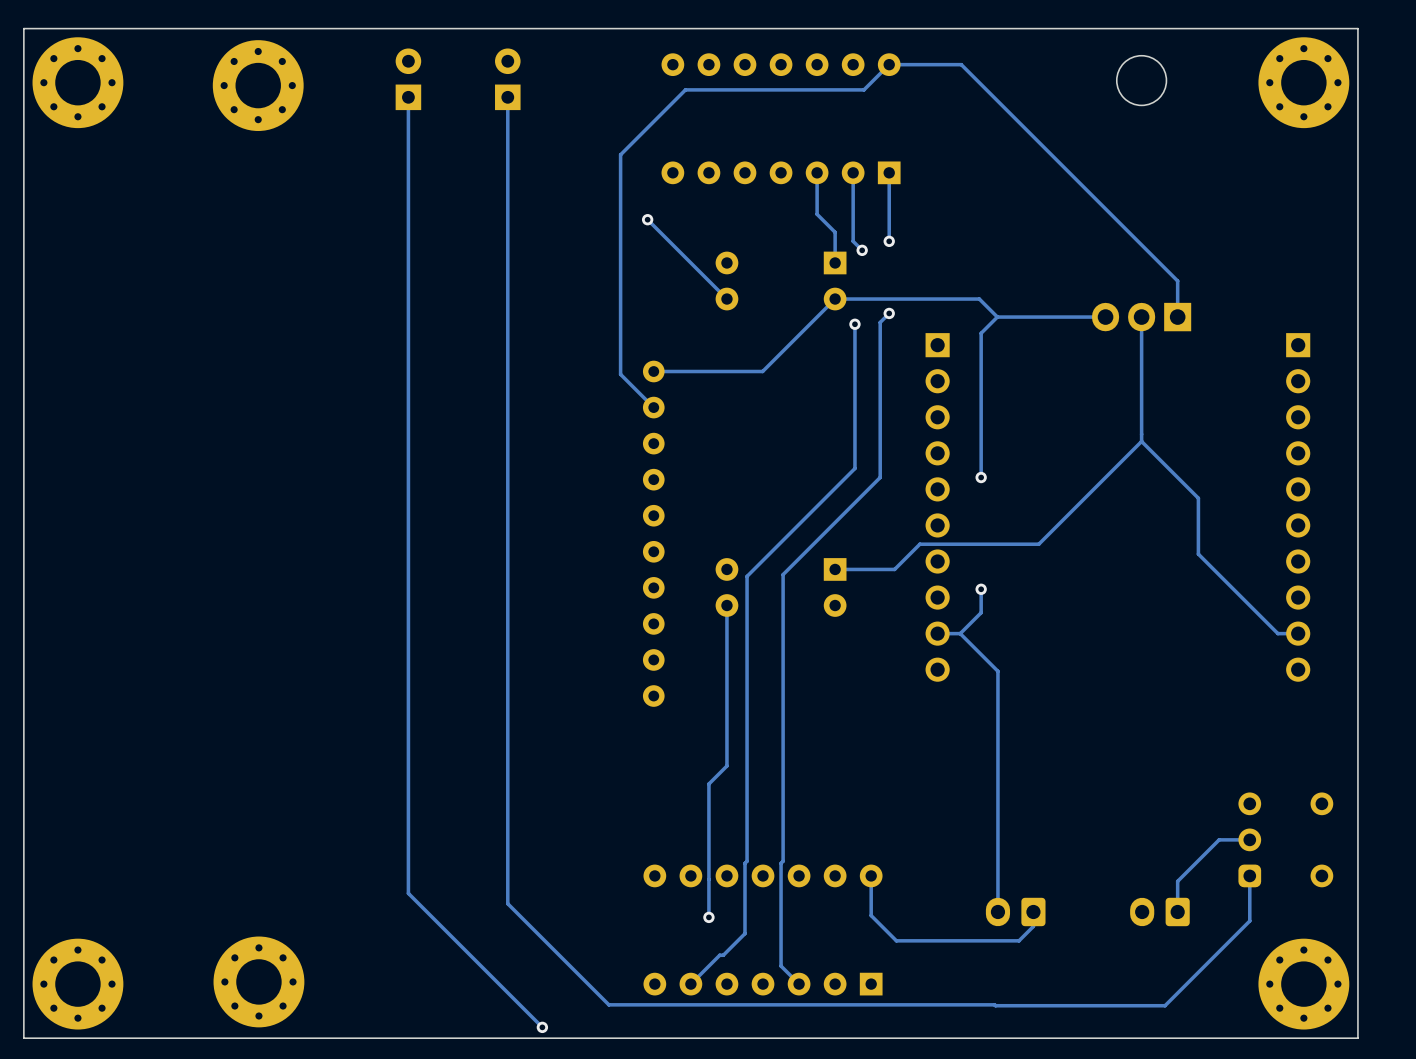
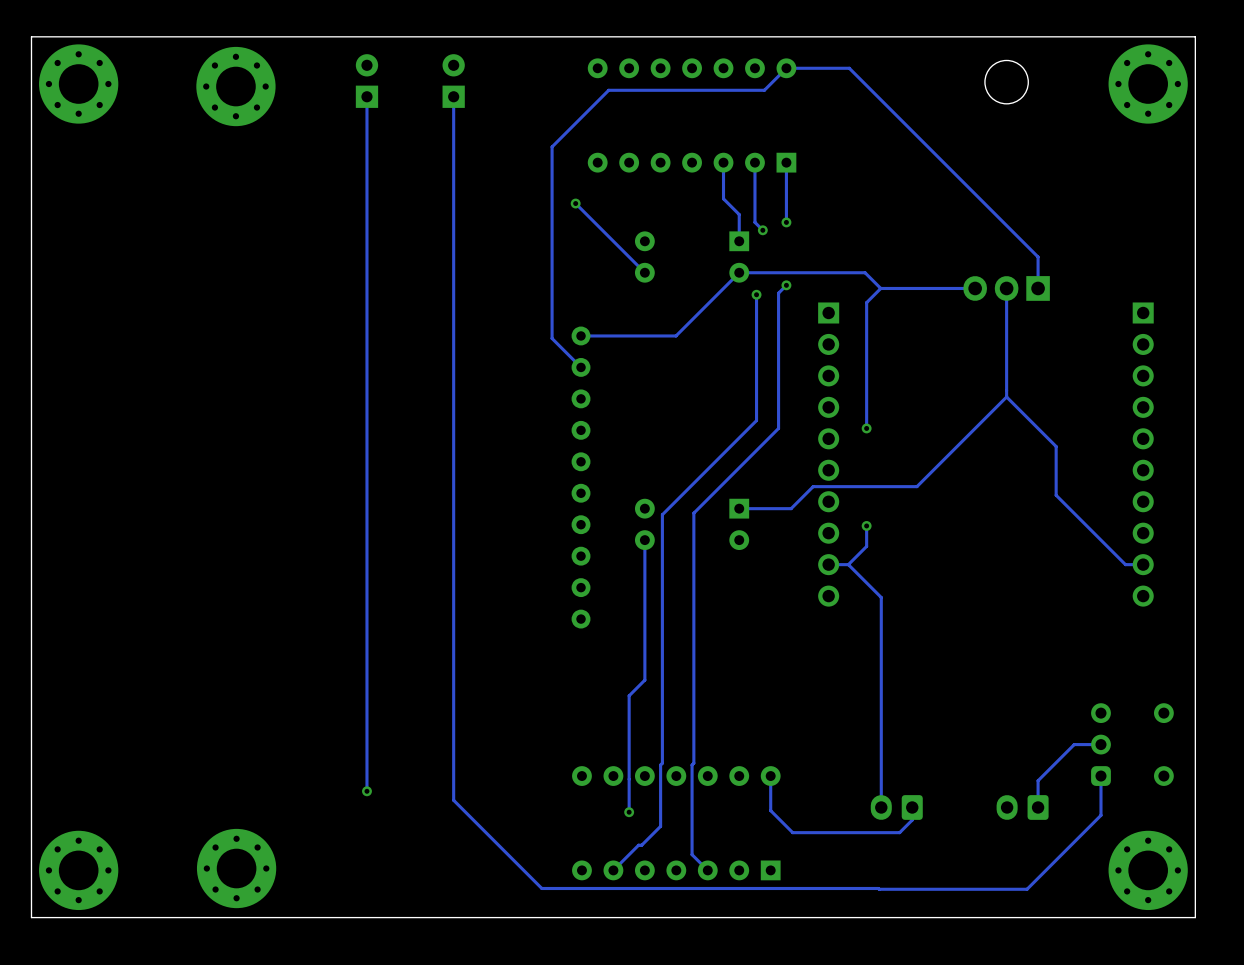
track: (408, 893) (542, 1027) -> none
via: none -> (366, 791)
via: (542, 1027) -> none

